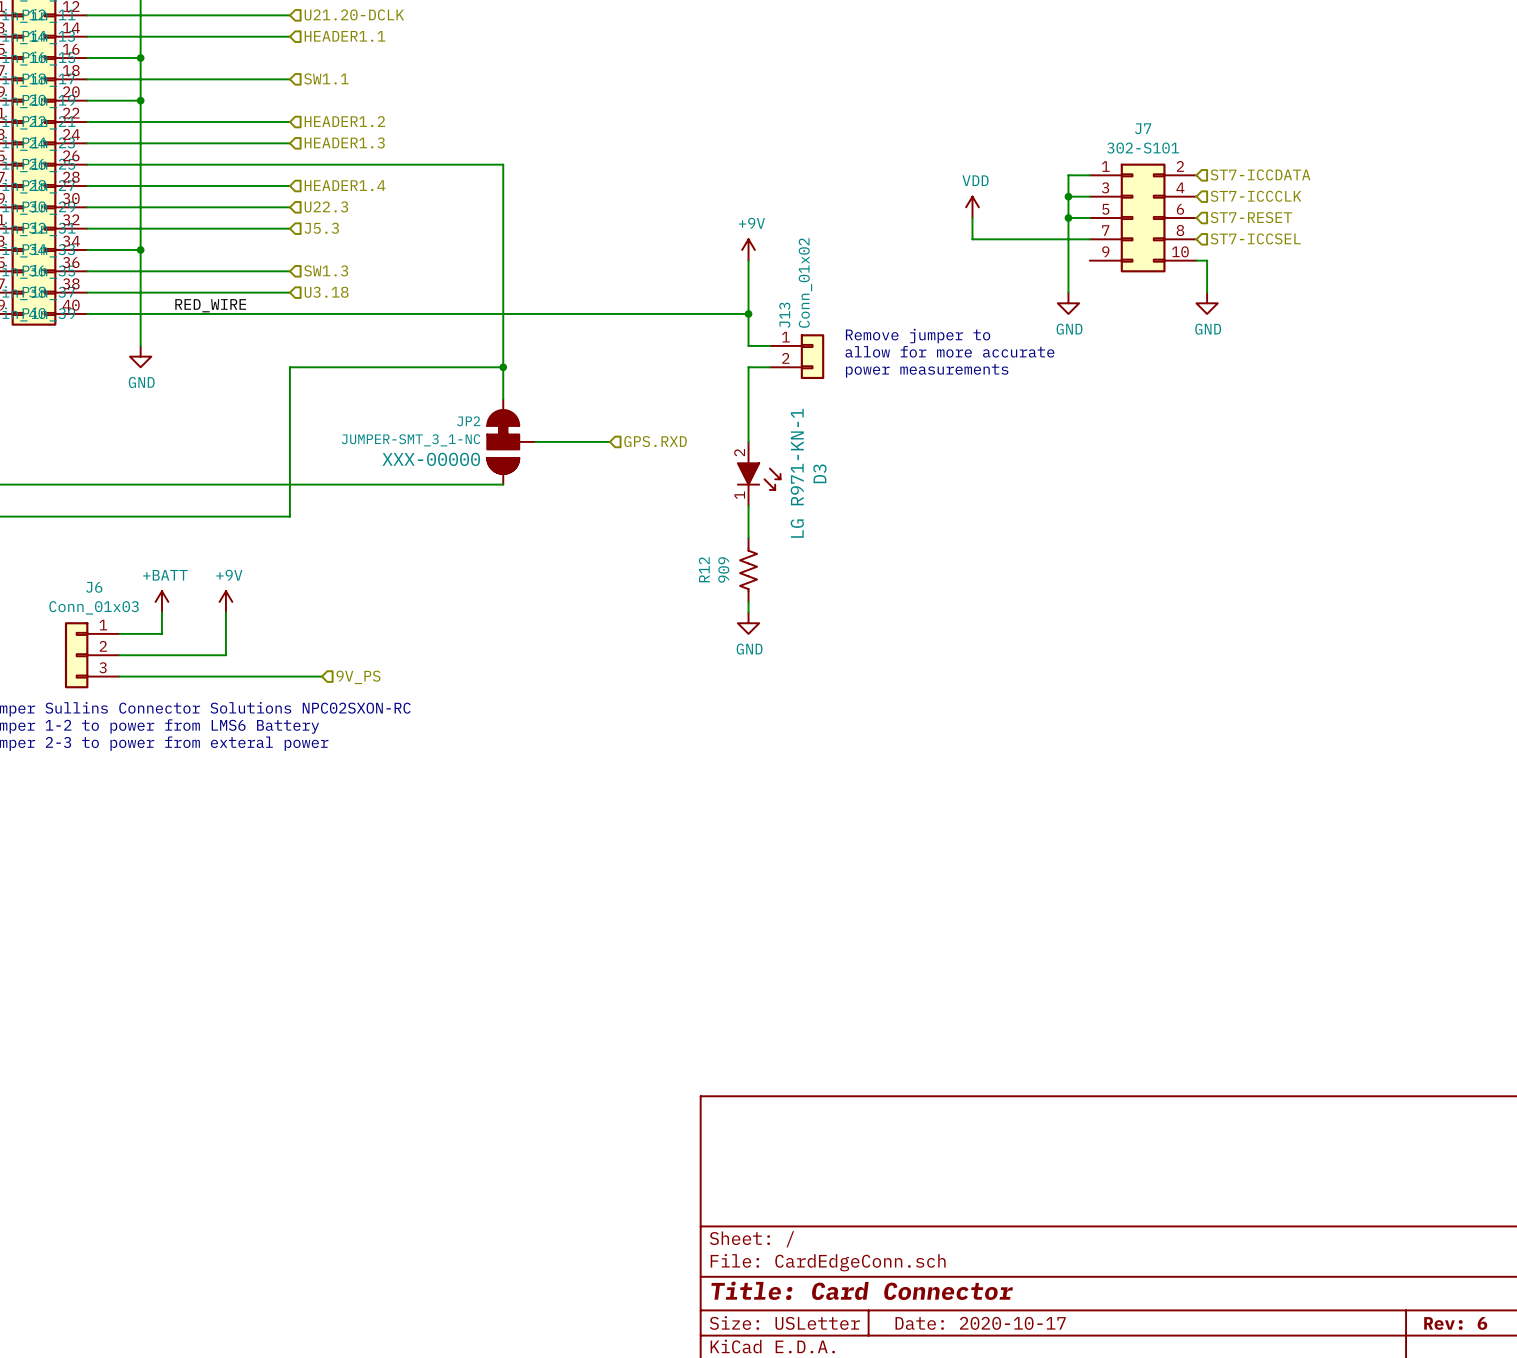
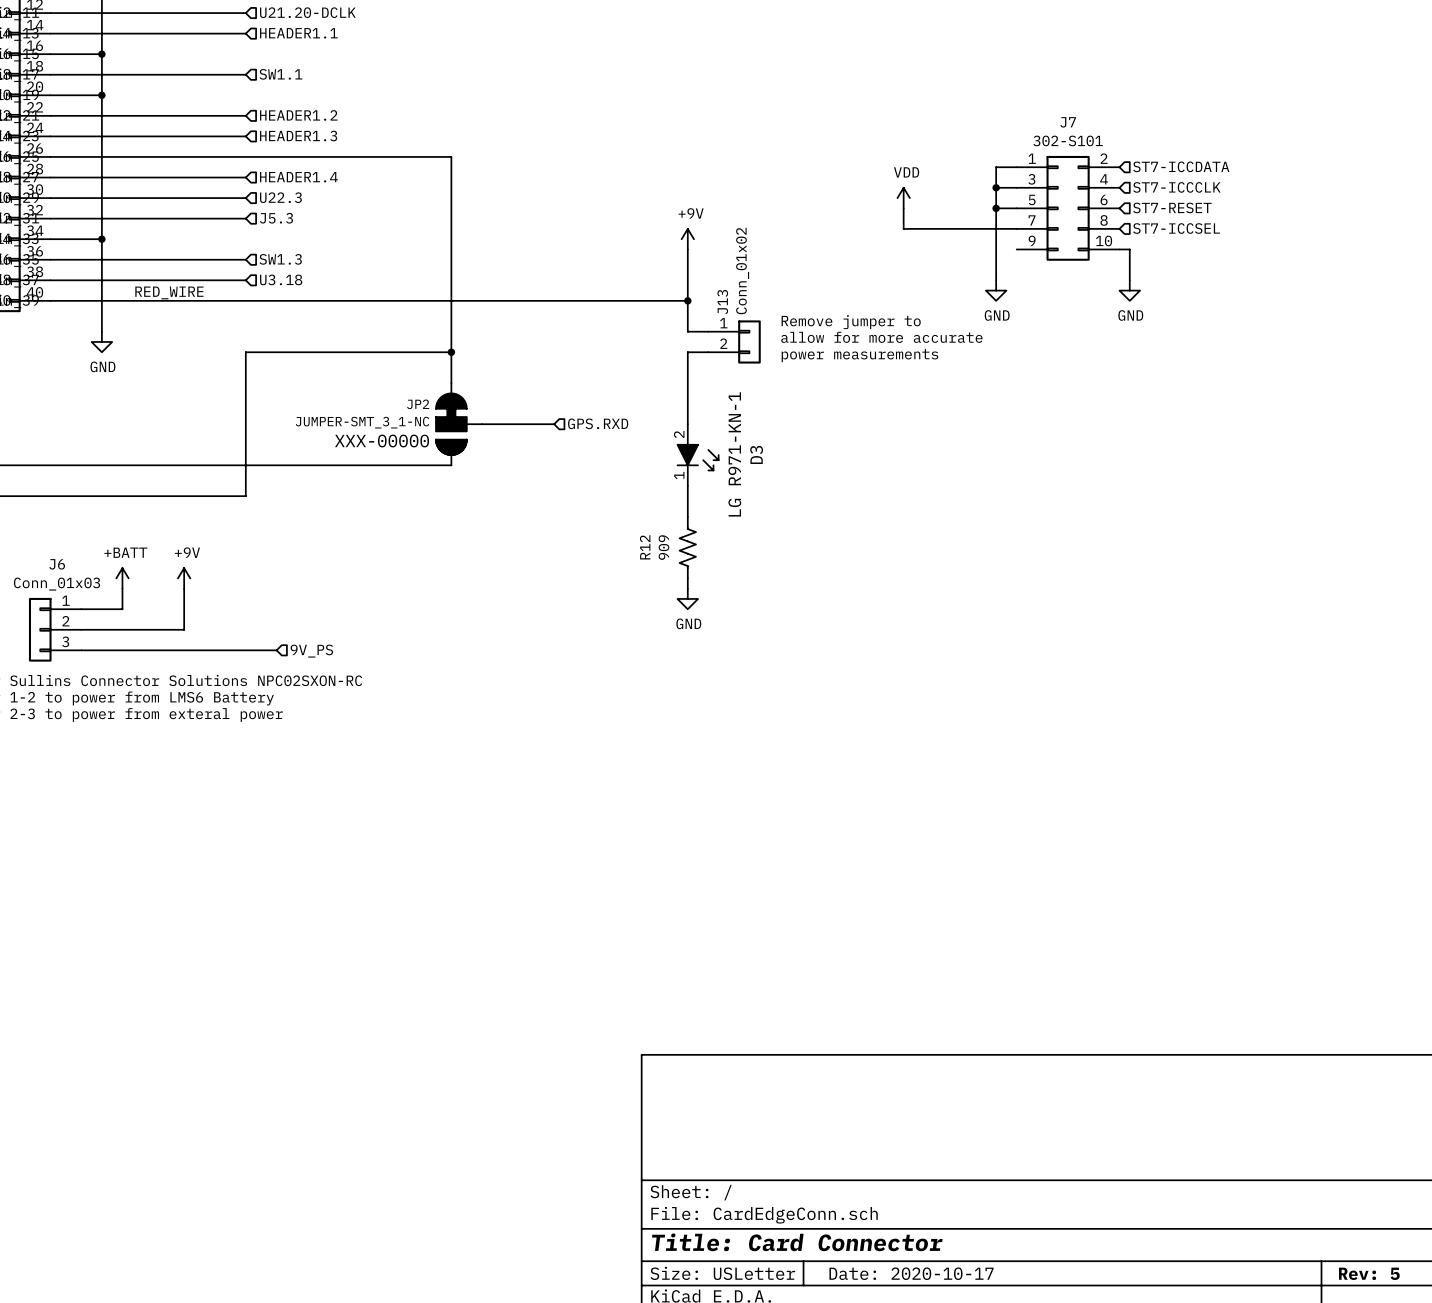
title block: Rev: 6 (1455, 1323) -> Rev: 5 (1369, 1273)

